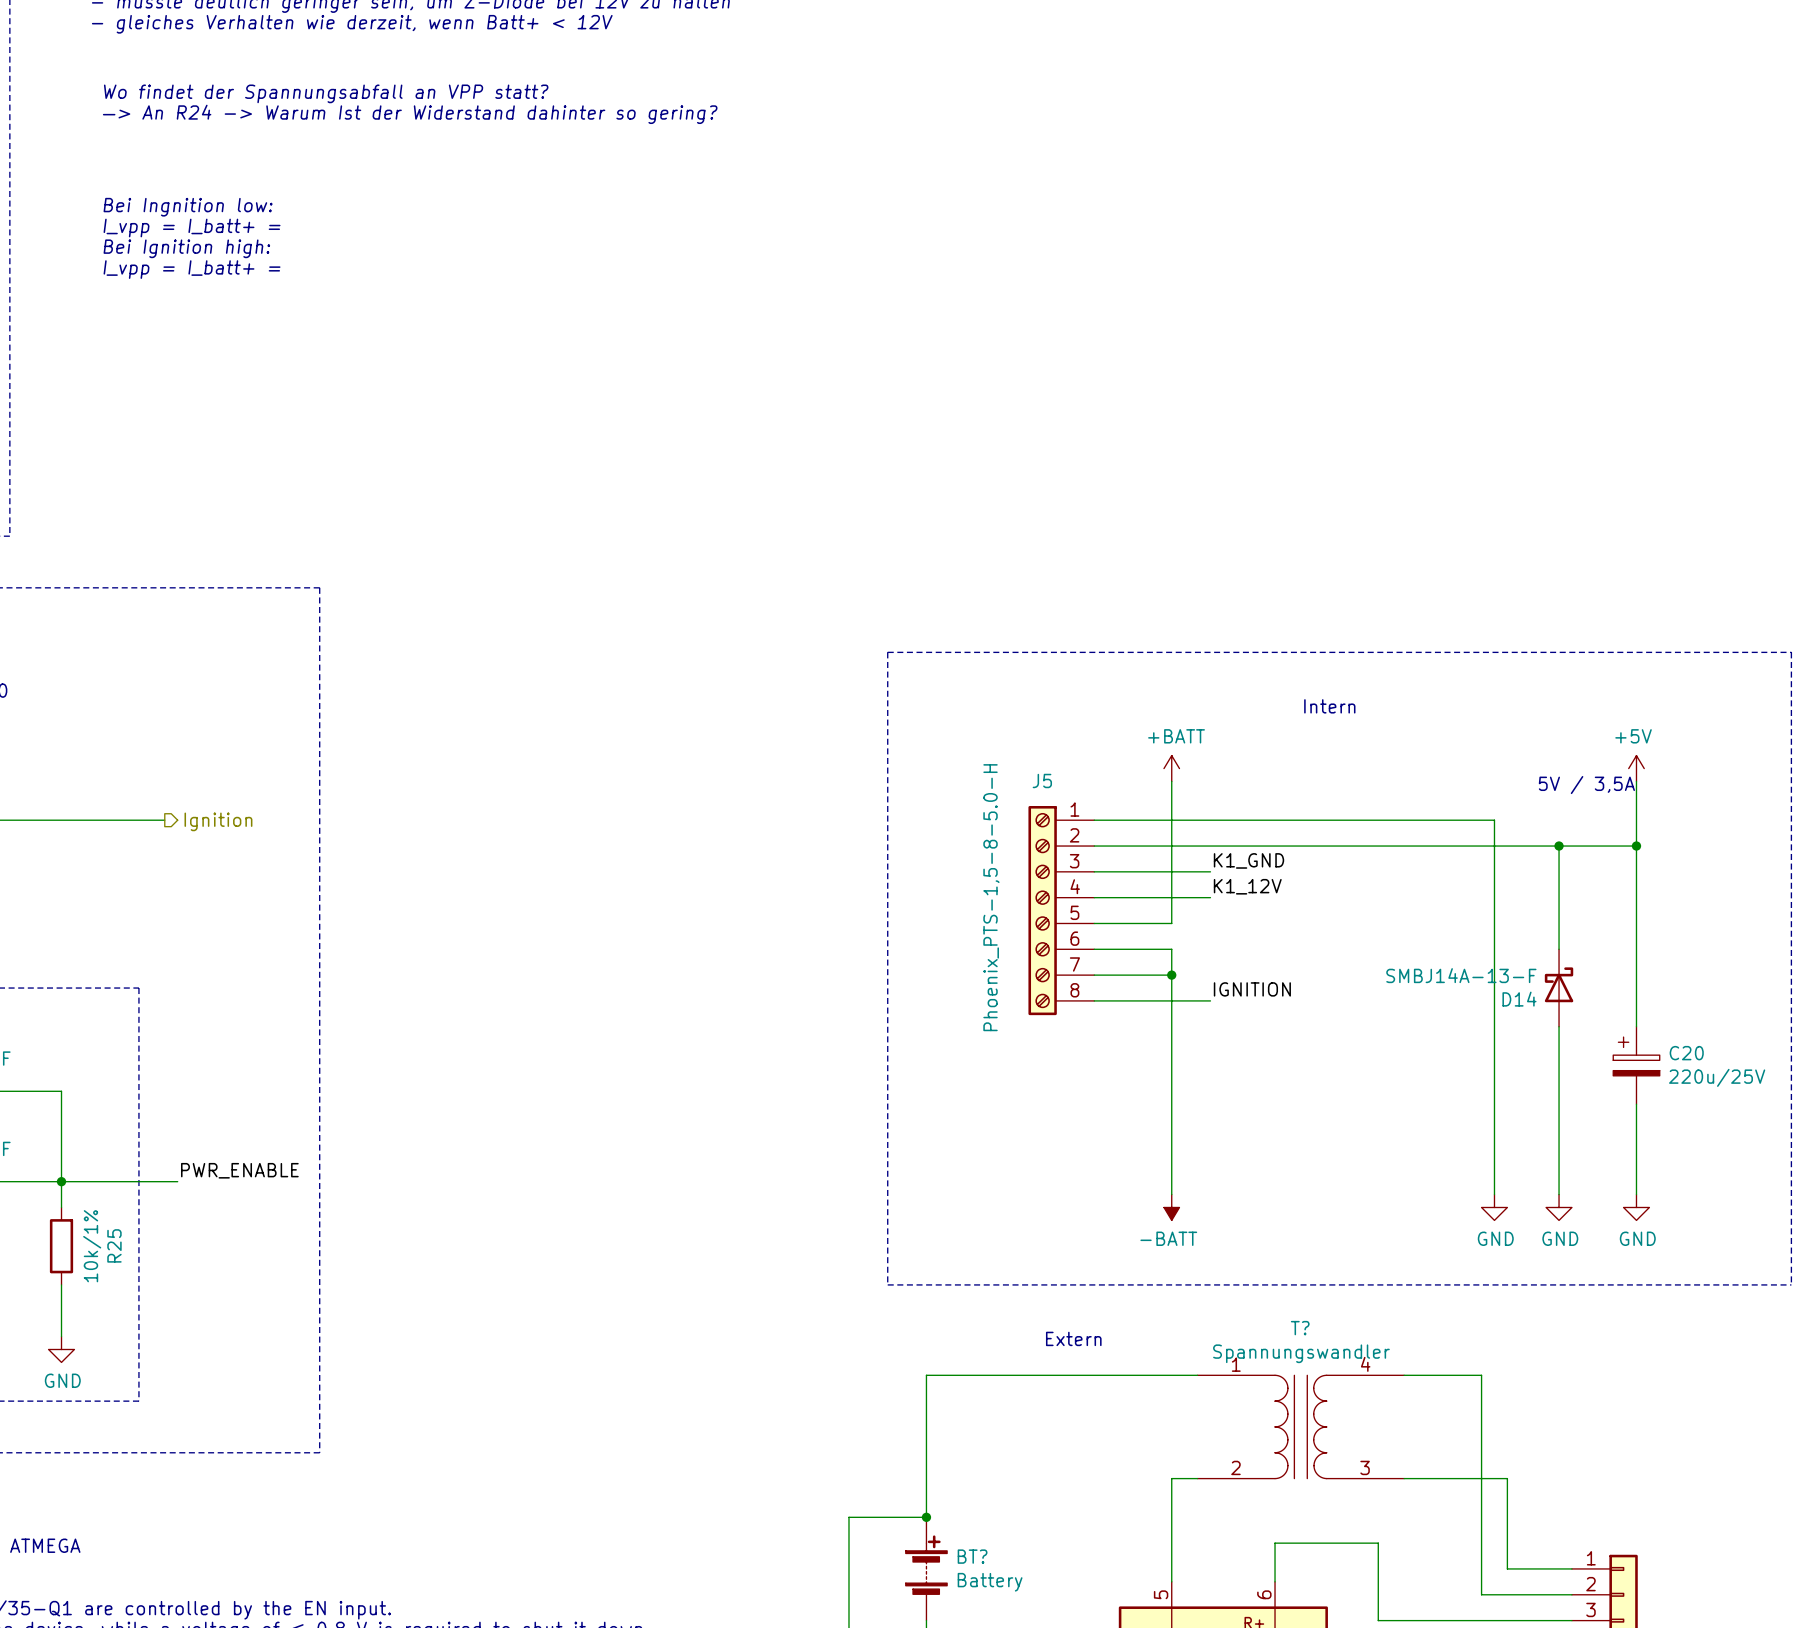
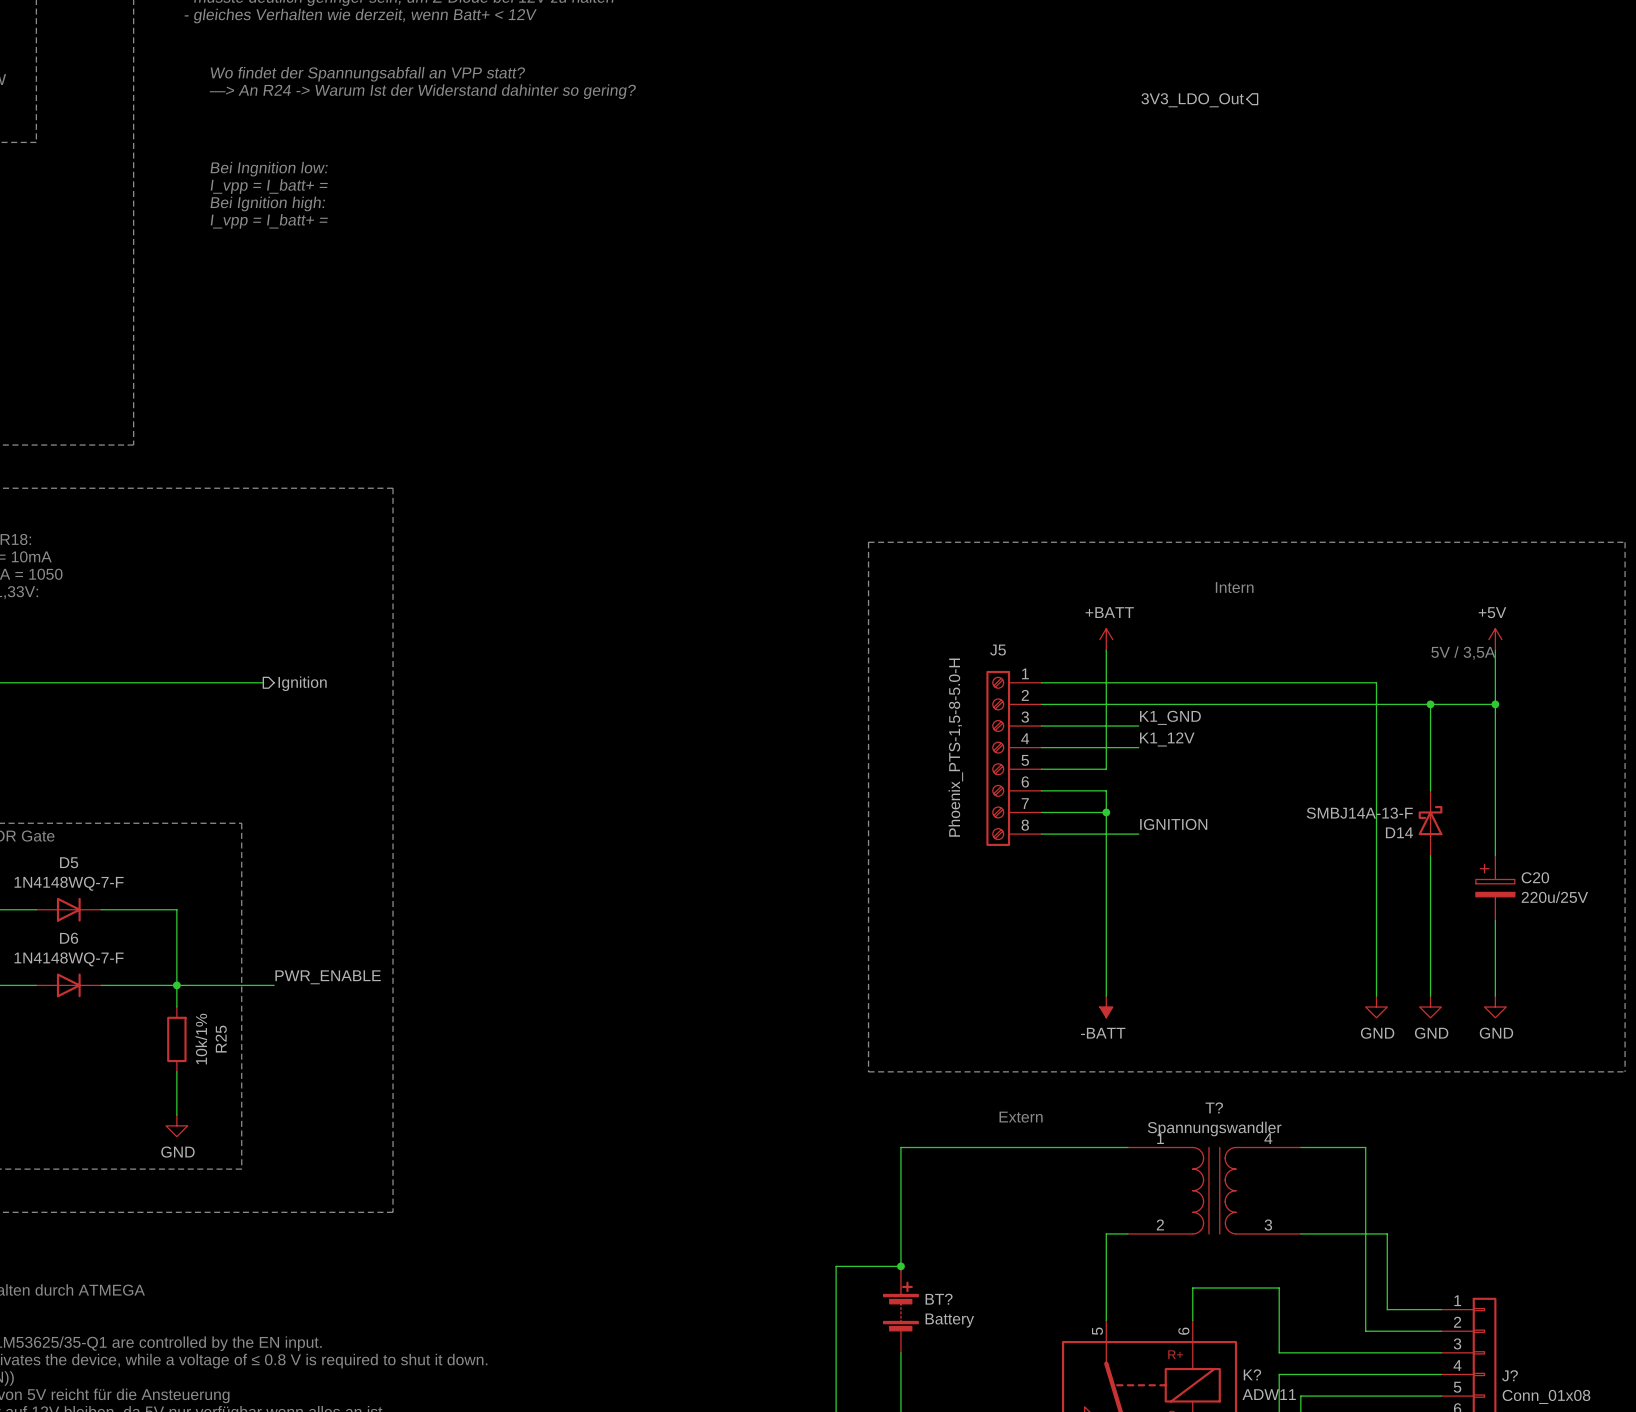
hierarchical label: none -> 3V3_LDO_Out (1192, 100)

